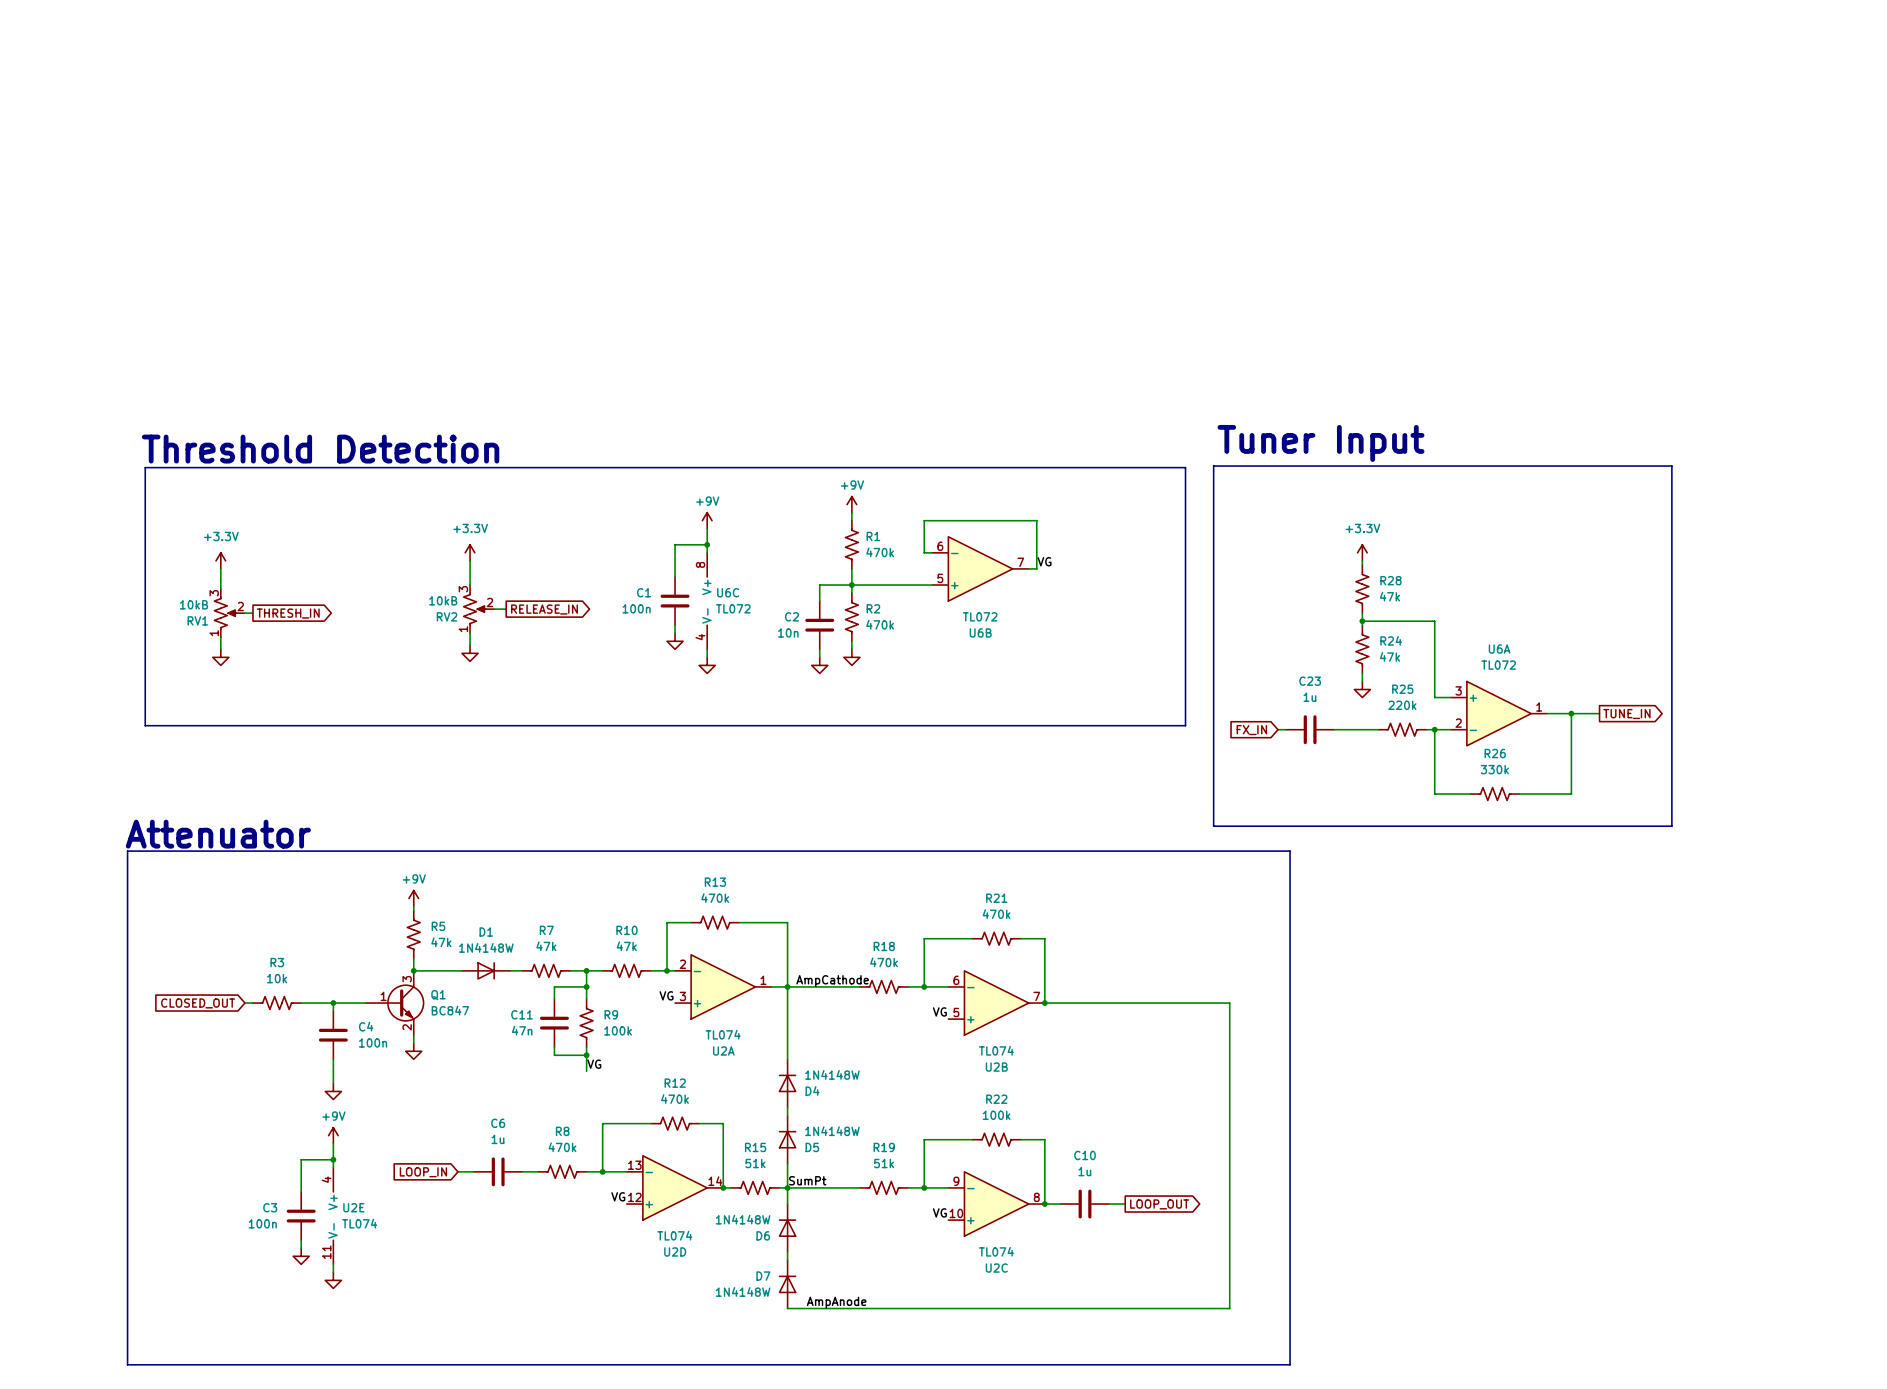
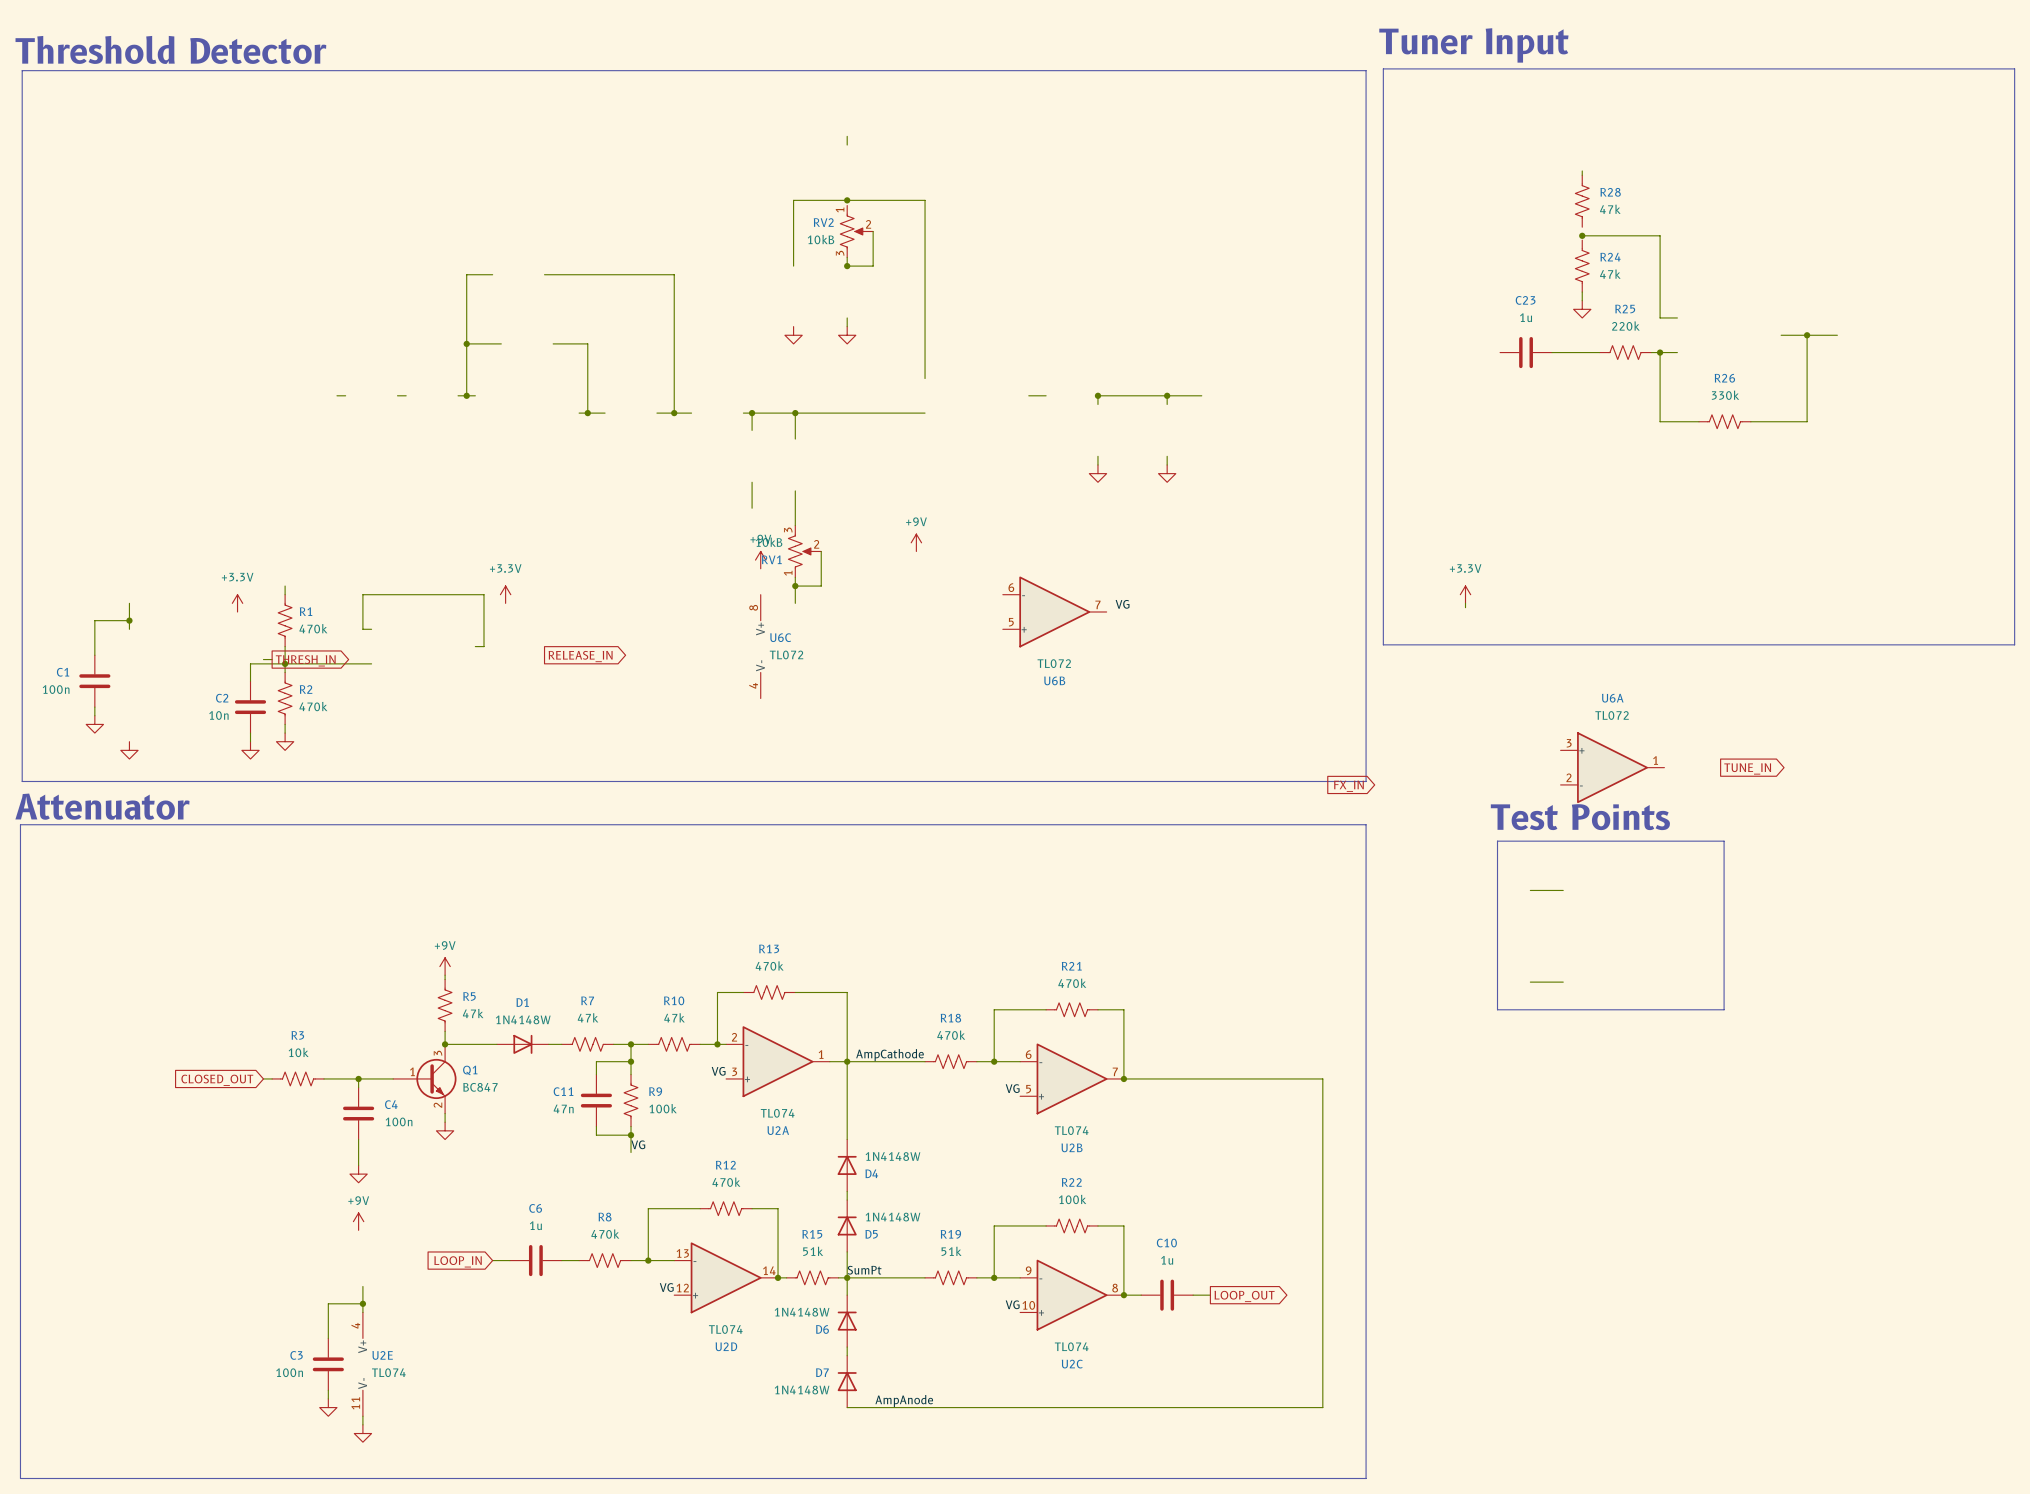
text: none -> Tuner Input (1473, 45)
text: none -> Threshold Detector (170, 49)
line: none -> (1383, 68) (2014, 68) (2014, 644) (1383, 644) (1383, 68)
line: none -> (22, 70) (1366, 70) (1366, 781) (22, 781) (22, 70)
wire: none -> (847, 136) (847, 145)
wire: none -> (1582, 170) (1582, 175)
junction: none -> (847, 200)
wire: none -> (873, 231) (873, 266) (847, 266) (847, 257)
wire: none -> (1582, 235) (1660, 235) (1660, 317) (1677, 317)
junction: none -> (1582, 235)
wire: none -> (793, 266) (793, 200) (925, 200) (925, 378)
junction: none -> (847, 266)
wire: none -> (492, 274) (466, 274) (466, 395)
wire: none -> (544, 274) (674, 274) (674, 413)
wire: none -> (1582, 292) (1582, 300)
power symbol: none -> (1582, 309)
wire: none -> (847, 317) (847, 326)
power symbol: none -> (793, 335)
power symbol: none -> (847, 335)
wire: none -> (1781, 335) (1837, 335)
wire: none -> (1807, 335) (1807, 421) (1750, 421)
junction: none -> (1807, 335)
wire: none -> (466, 343) (501, 343)
junction: none -> (466, 343)
wire: none -> (553, 343) (587, 343) (587, 413)
wire: none -> (1551, 352) (1599, 352)
wire: none -> (1651, 352) (1677, 352)
wire: none -> (1660, 352) (1660, 421) (1698, 421)
junction: none -> (1660, 352)
wire: none -> (336, 395) (345, 395)
wire: none -> (397, 395) (406, 395)
wire: none -> (458, 395) (475, 395)
junction: none -> (466, 395)
wire: none -> (1028, 395) (1046, 395)
junction: none -> (1097, 395)
wire: none -> (1167, 395) (1167, 404)
junction: none -> (1167, 395)
wire: none -> (1201, 395) (1097, 395) (1097, 404)
wire: none -> (579, 413) (605, 413)
junction: none -> (587, 413)
wire: none -> (656, 413) (691, 413)
junction: none -> (674, 413)
wire: none -> (743, 413) (925, 413)
wire: none -> (752, 413) (752, 430)
junction: none -> (752, 413)
wire: none -> (795, 413) (795, 439)
junction: none -> (795, 413)
wire: none -> (1097, 456) (1097, 464)
wire: none -> (1167, 456) (1167, 464)
power symbol: none -> (1097, 473)
power symbol: none -> (1167, 473)
text: Tuner Input (1320, 443) -> none
wire: none -> (752, 482) (752, 508)
text: Threshold Detection (320, 449) -> none
wire: none -> (795, 490) (795, 525)
line: (1213, 466) (1671, 466) (1671, 826) (1213, 826) (1213, 466) -> none
line: (145, 467) (1185, 467) (1185, 725) (145, 725) (145, 467) -> none
wire: none -> (821, 551) (821, 586) (795, 586)
wire: (851, 512) (851, 520) -> none
wire: (707, 528) (707, 552) -> (795, 577) (795, 603)
wire: none -> (285, 586) (285, 594)
wire: (707, 544) (675, 544) (675, 576) -> none
junction position: (707, 544) -> (795, 586)
R1 position: (851, 544) -> (285, 620)
wire: (932, 552) (924, 552) (924, 520) (1036, 520) (1036, 568) (1028, 568) -> none
wire: none -> (129, 603) (129, 629)
wire: (470, 560) (470, 585) -> none
wire: (220, 568) (220, 589) -> none
wire: (851, 568) (851, 593) -> none
wire: none -> (129, 620) (94, 620) (94, 655)
junction: none -> (129, 620)
wire: none -> (371, 629) (362, 629) (362, 594) (483, 594) (483, 646) (475, 646)
junction: (851, 585) -> none
wire: (932, 585) (819, 585) (819, 601) -> none
R28 position: (1362, 589) -> (1582, 201)
wire: none -> (285, 646) (285, 672)
C1 position: (675, 601) -> (94, 681)
RV2 flip: as is (474, 609) -> up-down (852, 231)
RV2 position: (478, 609) -> (856, 231)
wire: (494, 609) (506, 609) -> none
RV1 position: (229, 613) -> (804, 551)
wire: (1362, 613) (1362, 625) -> none
junction: none -> (285, 663)
wire: none -> (371, 663) (250, 663) (250, 681)
R2 position: (851, 617) -> (285, 698)
wire: (1362, 621) (1434, 621) (1434, 697) (1450, 697) -> none
junction: (1362, 621) -> none
wire: (675, 625) (675, 633) -> none
C2 position: (819, 625) -> (250, 707)
wire: (470, 633) (470, 645) -> none
wire: (220, 637) (220, 649) -> none
power symbol: (675, 641) -> none
wire: (851, 641) (851, 649) -> none
wire: (707, 649) (707, 657) -> none
wire: (819, 649) (819, 657) -> none
R24 position: (1362, 649) -> (1582, 266)
power symbol: (470, 653) -> none
wire: none -> (94, 707) (94, 715)
power symbol: (220, 657) -> none
power symbol: (851, 657) -> none
power symbol: (707, 665) -> none
power symbol: (819, 665) -> none
power symbol: none -> (94, 724)
wire: none -> (285, 724) (285, 733)
wire: (1362, 673) (1362, 681) -> none
wire: none -> (250, 733) (250, 741)
power symbol: none -> (285, 741)
power symbol: (1362, 689) -> none
power symbol: none -> (129, 750)
power symbol: none -> (250, 750)
wire: (1547, 713) (1599, 713) -> none
wire: (1571, 713) (1571, 794) (1519, 794) -> none
junction: (1571, 713) -> none
wire: (1277, 729) (1286, 729) -> none
C23 position: (1310, 729) -> (1526, 352)
wire: (1334, 729) (1378, 729) -> none
R25 position: (1402, 729) -> (1625, 352)
wire: (1426, 729) (1450, 729) -> none
wire: (1434, 729) (1434, 794) (1470, 794) -> none
junction: (1434, 729) -> none
text: none -> Test Points (1580, 817)
line: none -> (1497, 841) (1724, 841) (1724, 1009) (1497, 1009) (1497, 841)
R26 position: (1495, 794) -> (1724, 421)
wire: none -> (1530, 890) (1563, 890)
text position: Attenuator (218, 834) -> Attenuator (102, 806)
line: (127, 851) (1290, 851) (1290, 1364) (127, 1364) (127, 851) -> (20, 824) (20, 1478) (1366, 1478) (1366, 824) (20, 824)
wire: none -> (1530, 982) (1563, 982)
wire: (333, 1143) (333, 1167) -> (362, 1286) (362, 1312)
wire: (333, 1159) (301, 1159) (301, 1191) -> (362, 1303) (328, 1303) (328, 1338)
junction: (333, 1159) -> none
junction: none -> (362, 1303)
C3 position: (301, 1216) -> (328, 1364)
U2E position: (333, 1216) -> (362, 1364)
wire: (301, 1240) (301, 1248) -> (328, 1390) (328, 1398)
power symbol: (301, 1256) -> none
wire: (333, 1264) (333, 1272) -> (362, 1416) (362, 1424)
power symbol: (333, 1280) -> none
power symbol: none -> (328, 1407)
power symbol: none -> (362, 1433)

